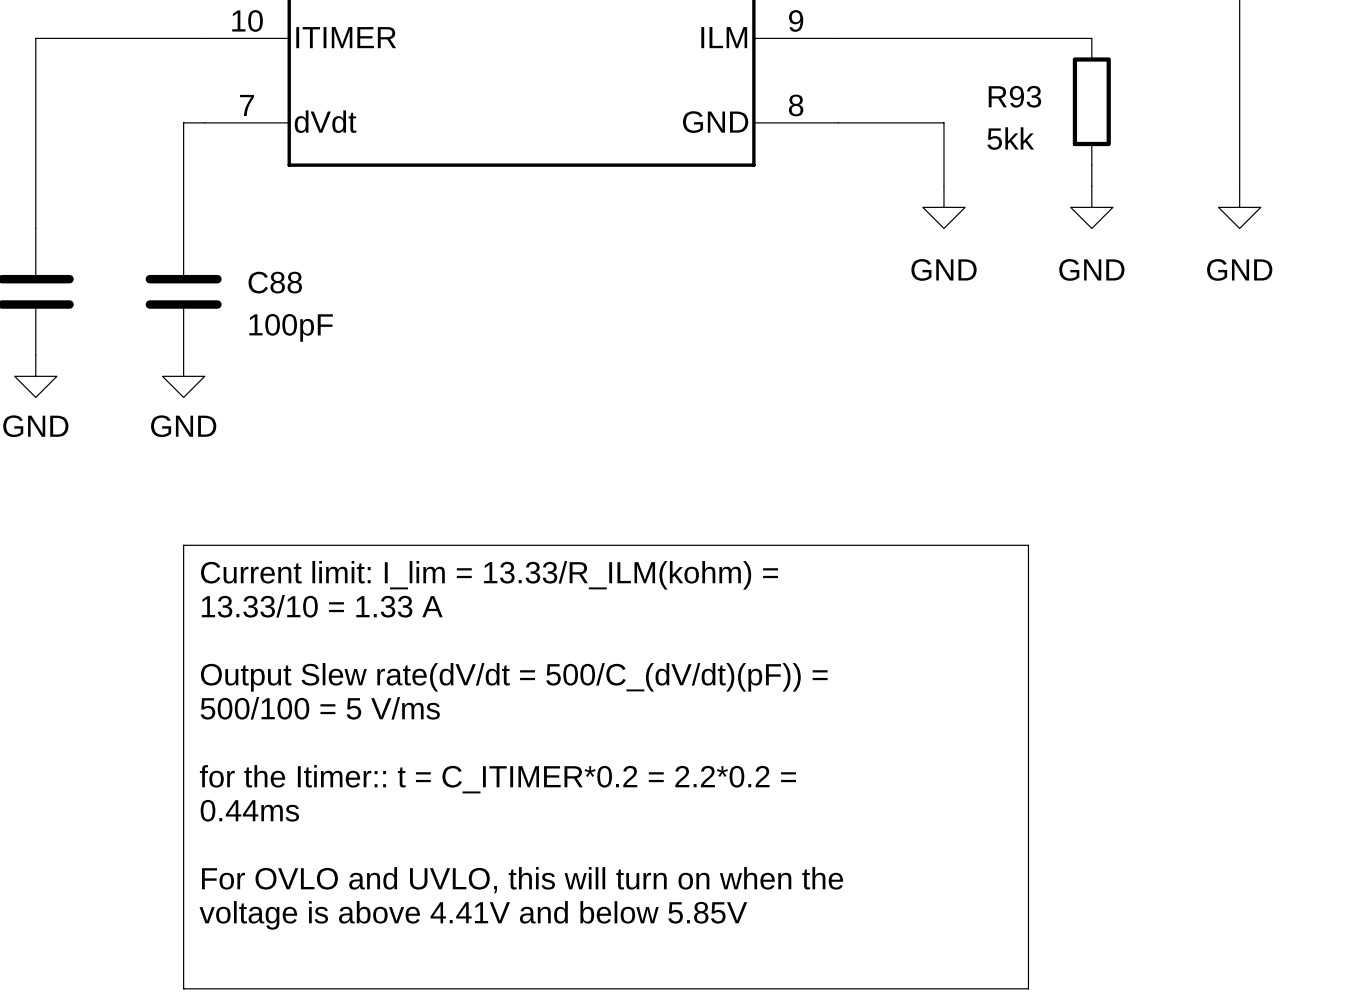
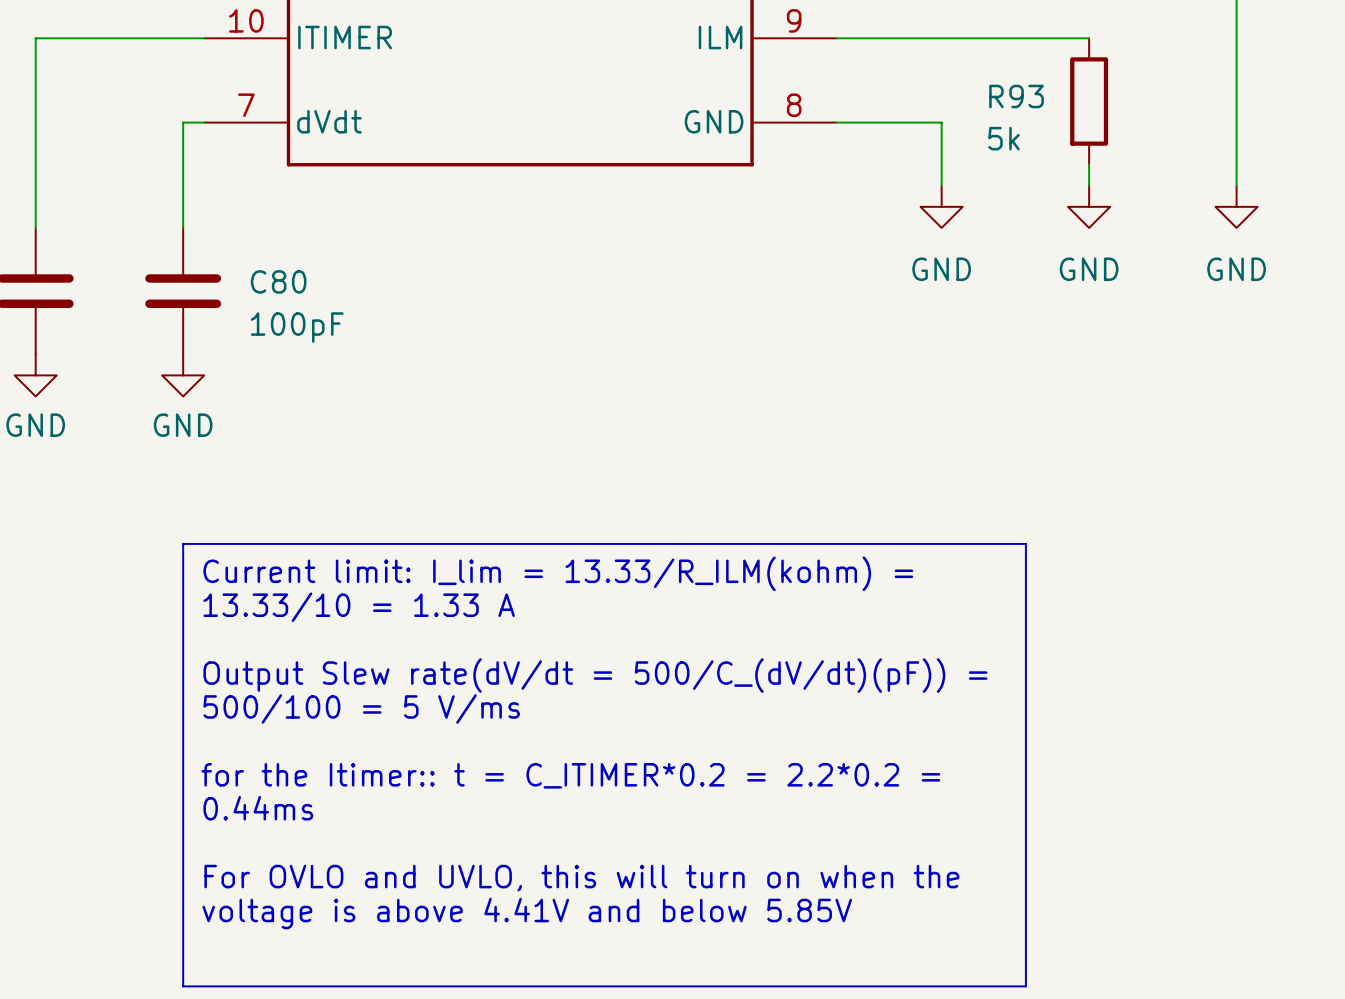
R93 value: 5kk (1010, 138) -> 5k (1003, 138)
C88 name: C88 (275, 282) -> C80 (278, 281)

